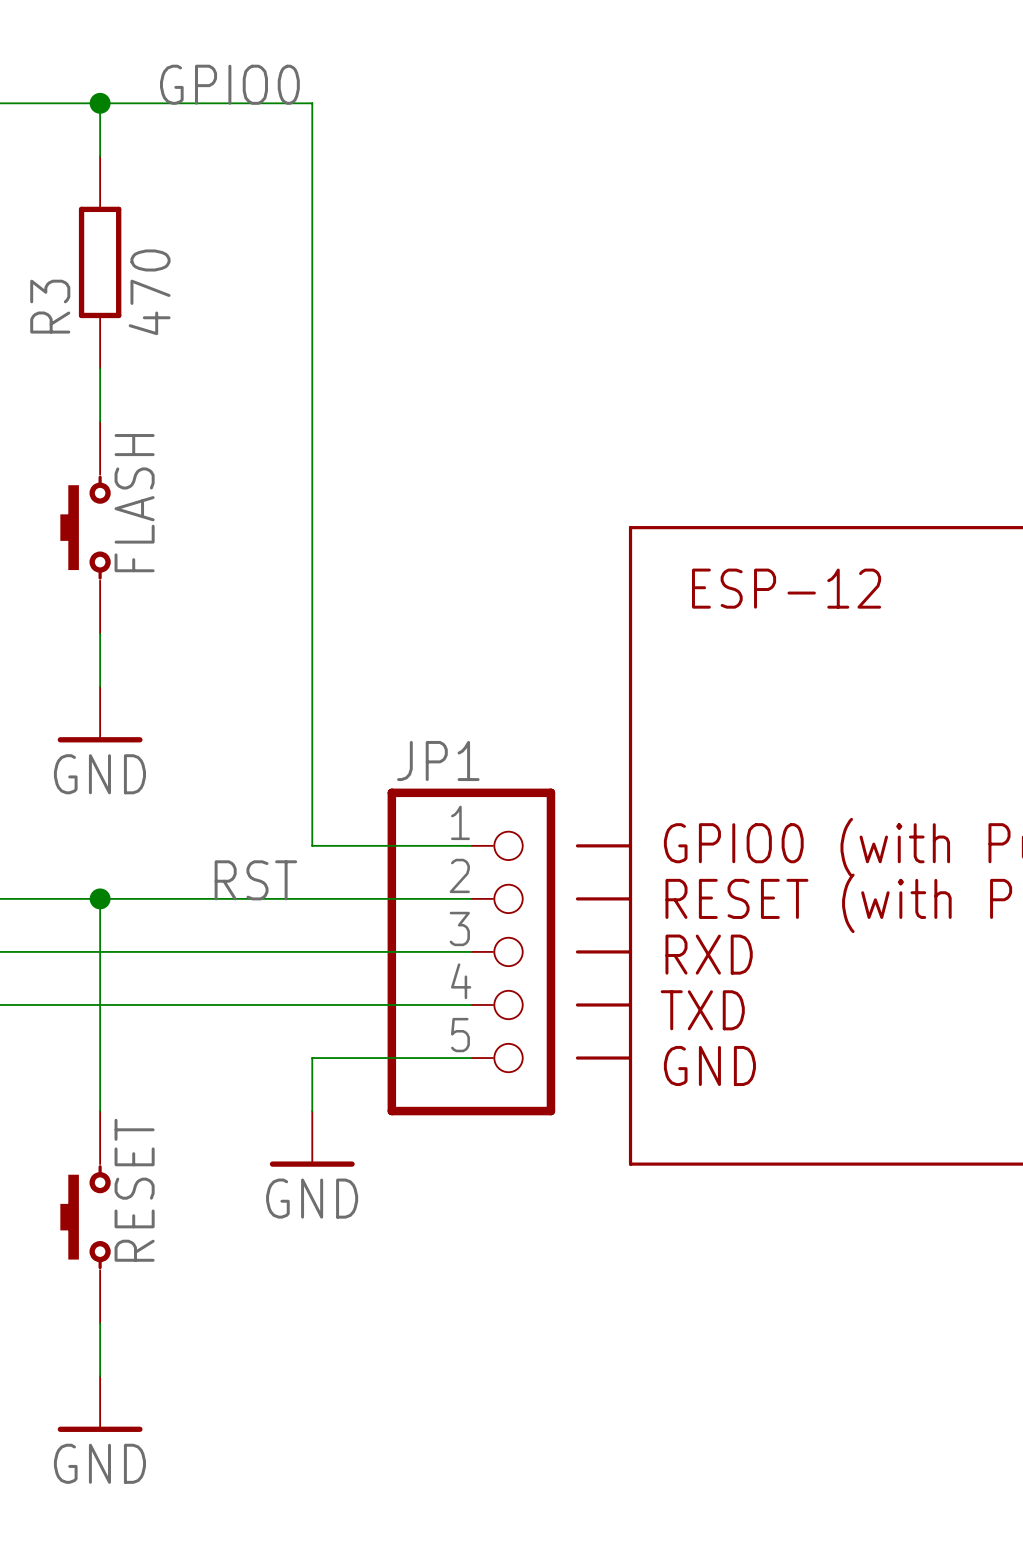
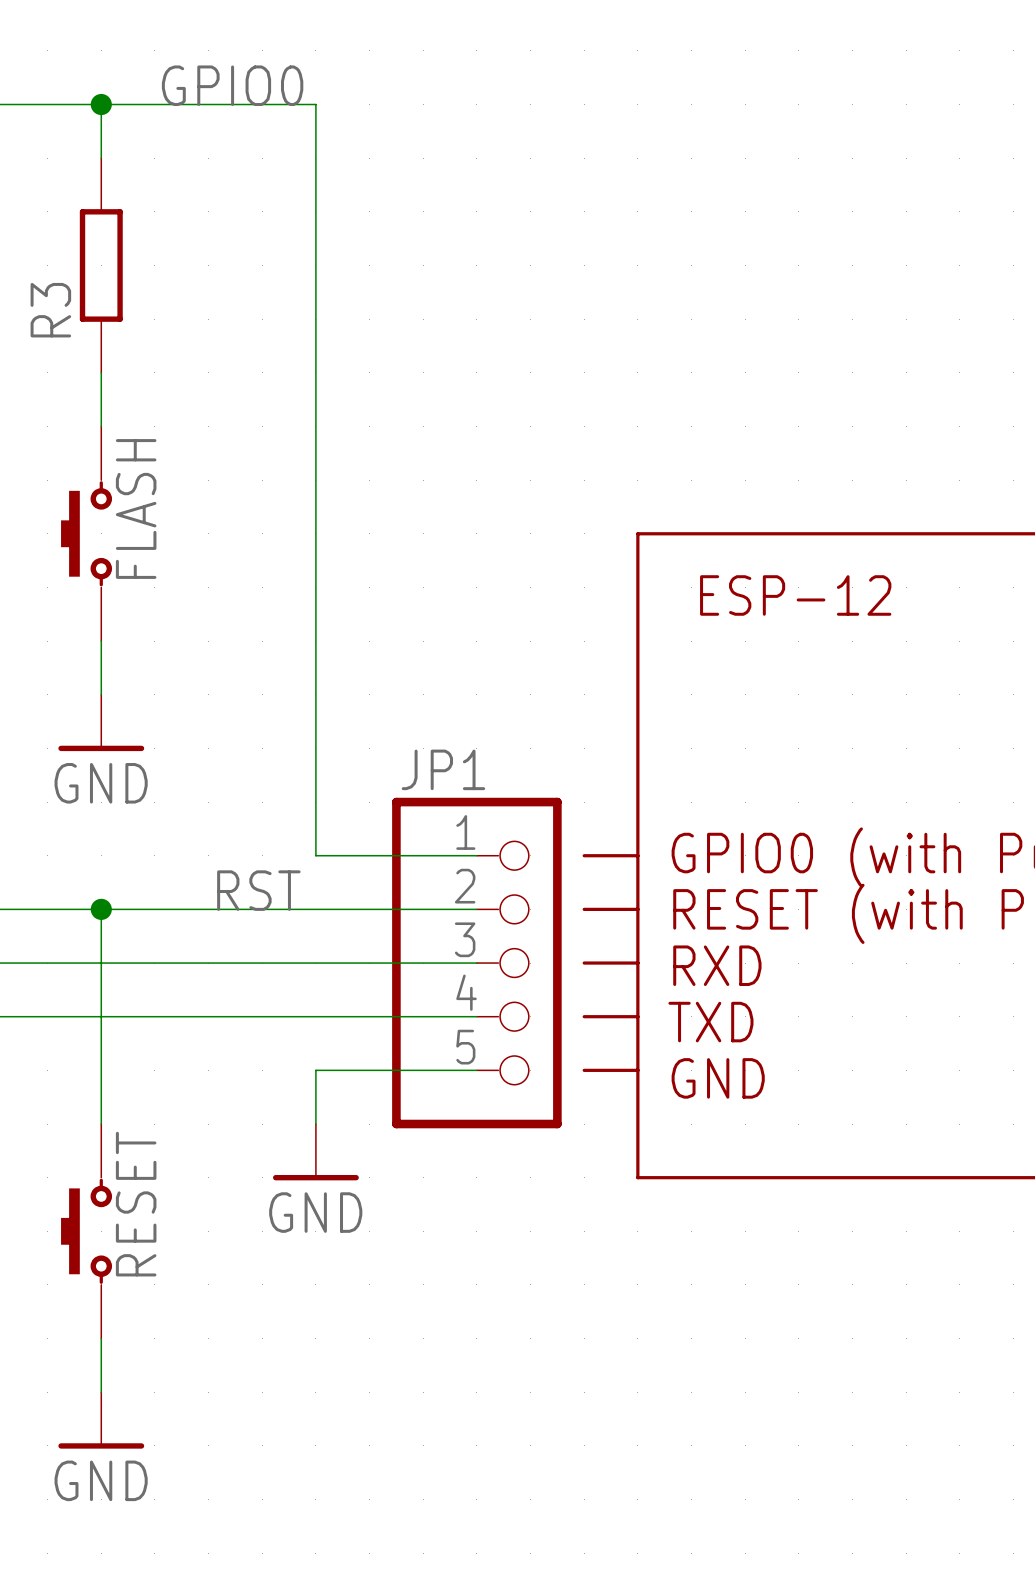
R3 value: 470 (149, 292) -> none

